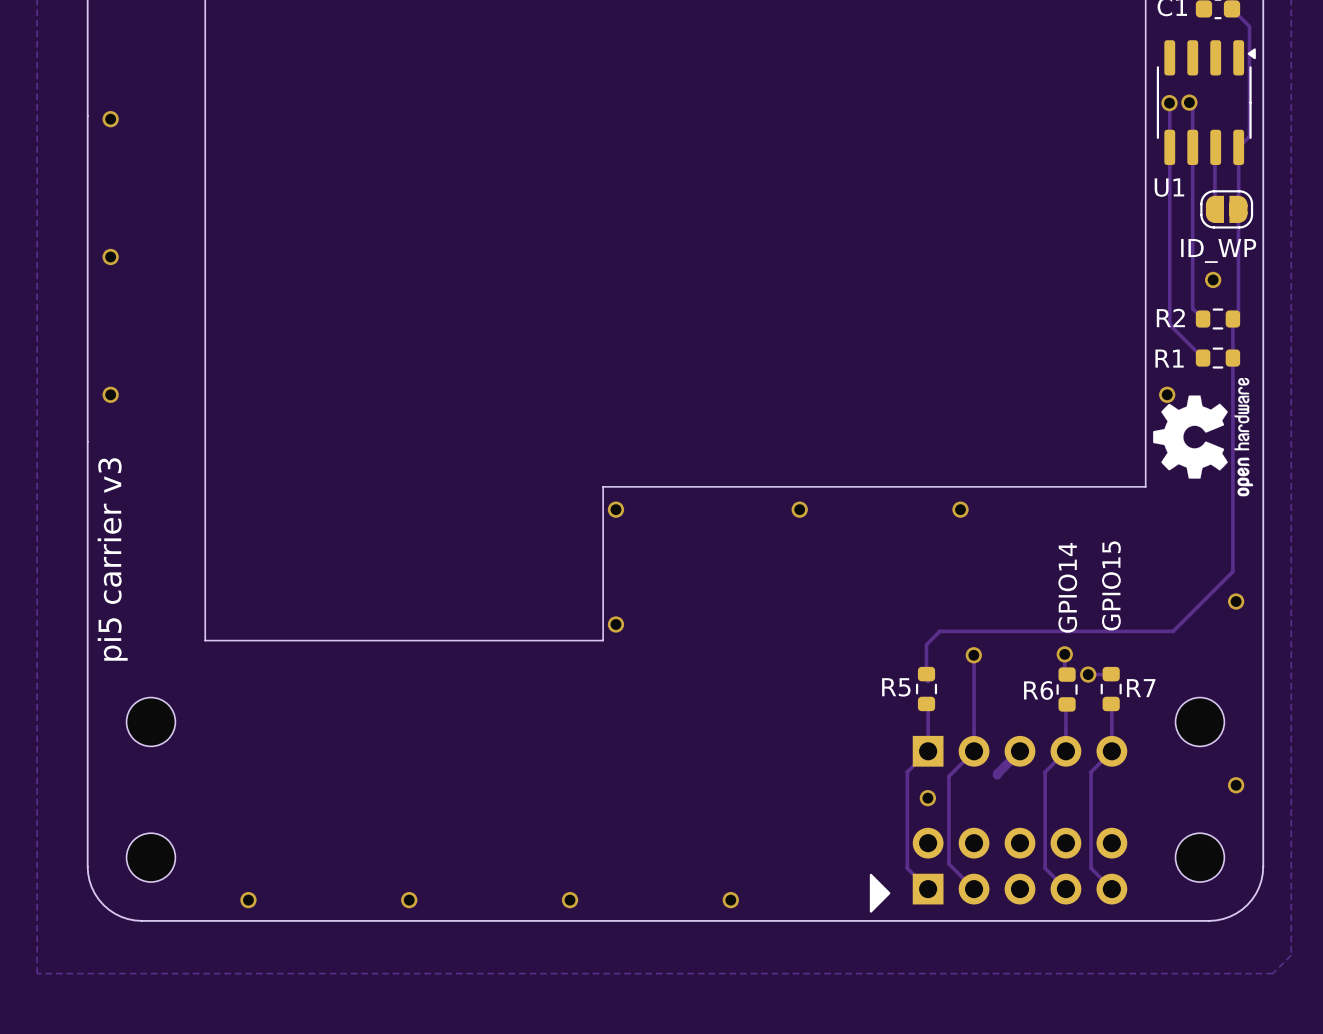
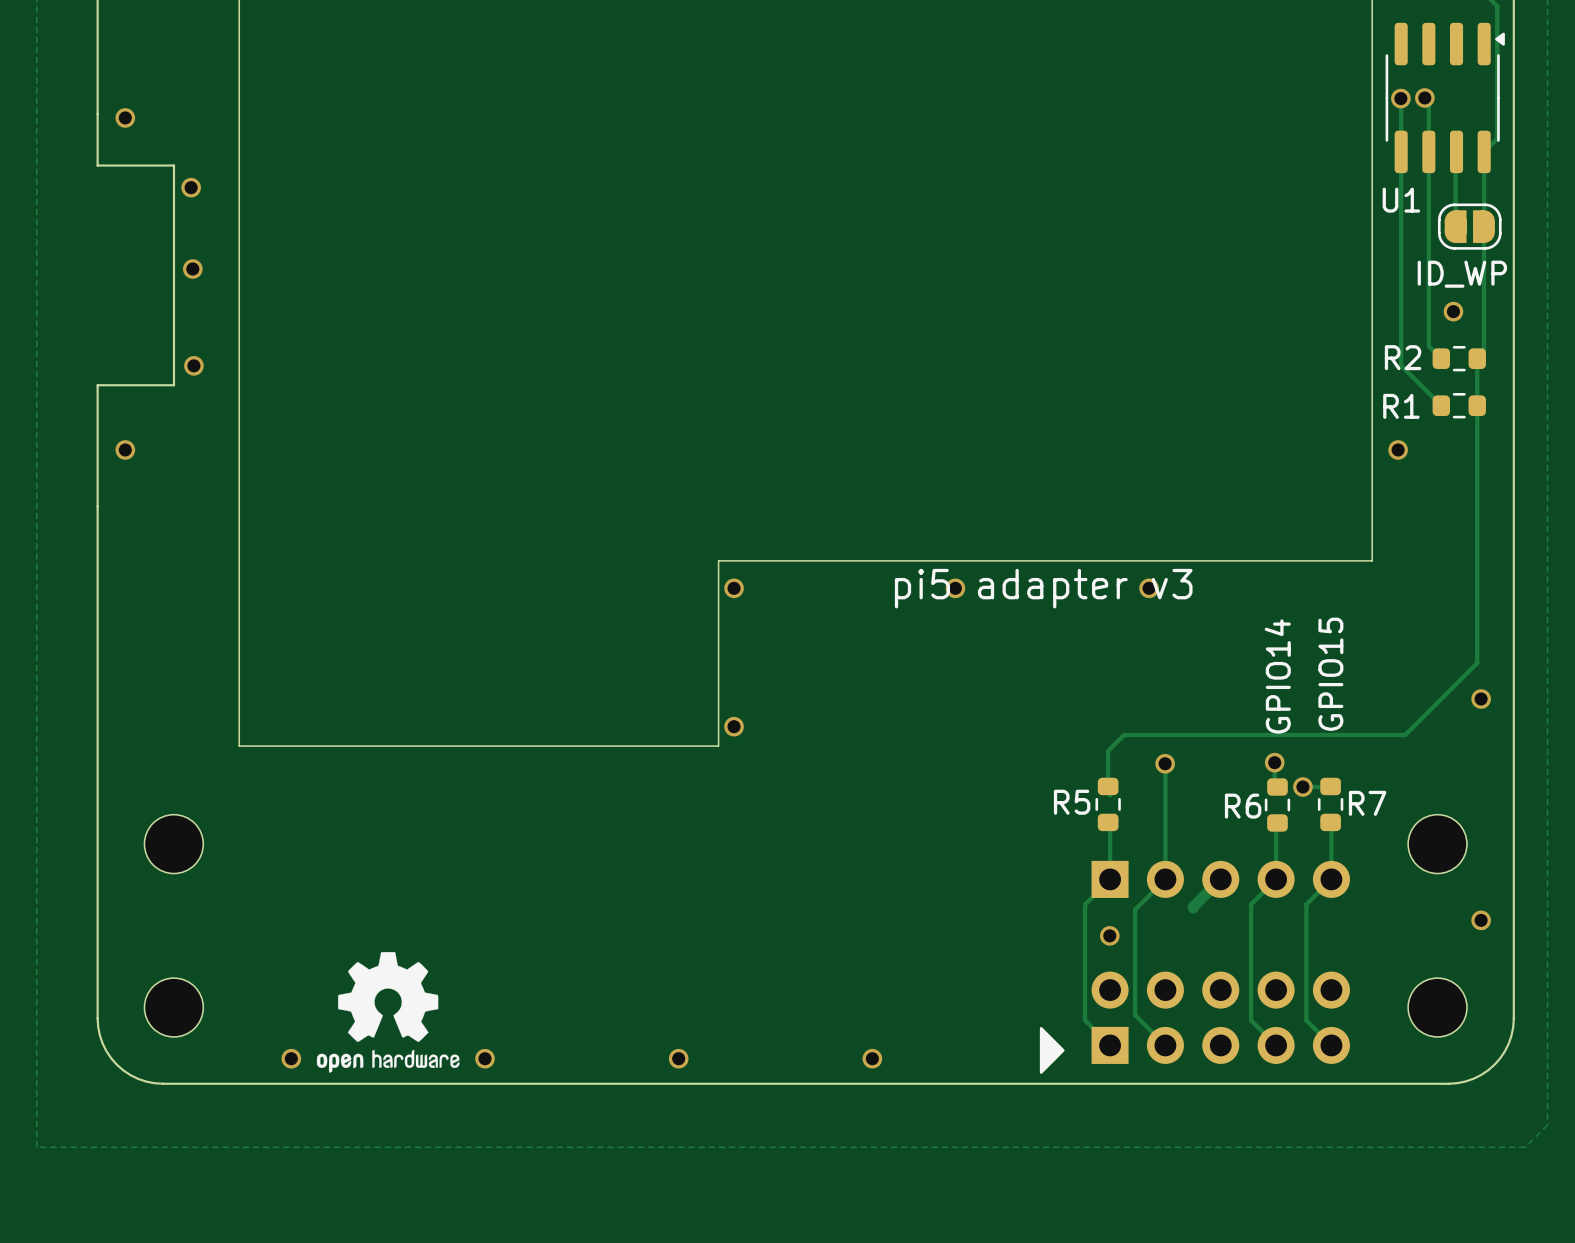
board edge: (87, 158) (87, 341) -> (97, 165) (174, 165) (174, 385) (97, 385)
via: none -> (191, 187)
via: none -> (192, 269)
via: (110, 256) -> none
via: none -> (193, 365)
drawing: [1153, 377, 1254, 497] -> none
text: none -> pi5 adapter v3 (1043, 588)
text: pi5 carrier v3 (112, 559) -> none
drawing: none -> [316, 952, 460, 1073]

